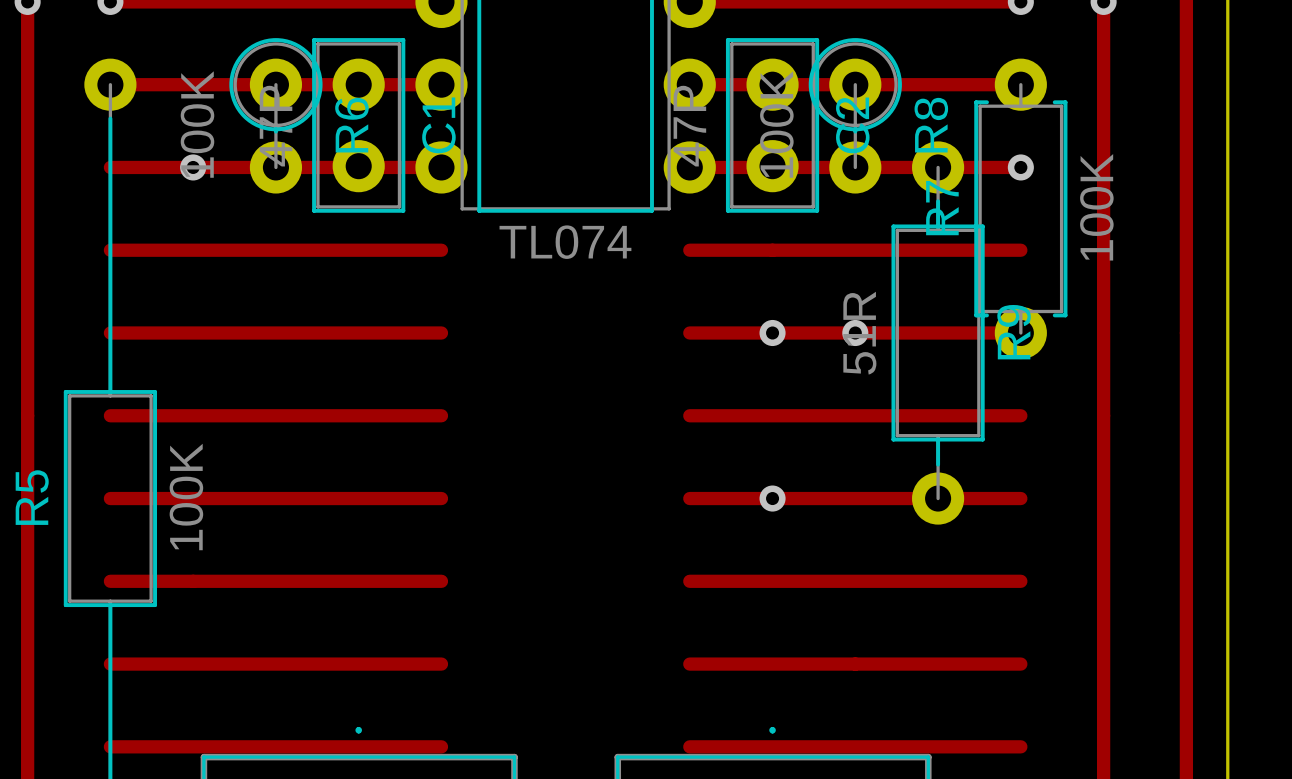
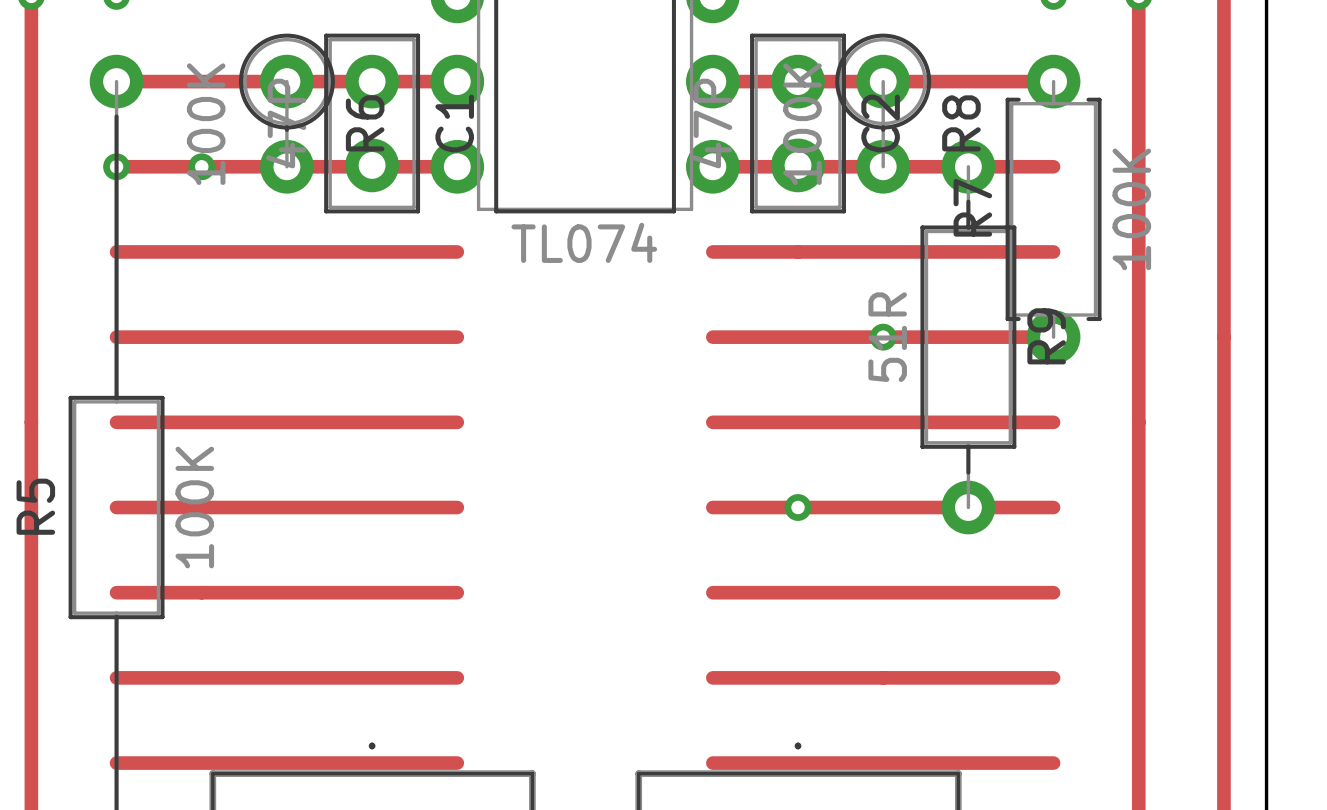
via: none -> (116, 166)
via: (1020, 167) -> none
via: (772, 333) -> none

